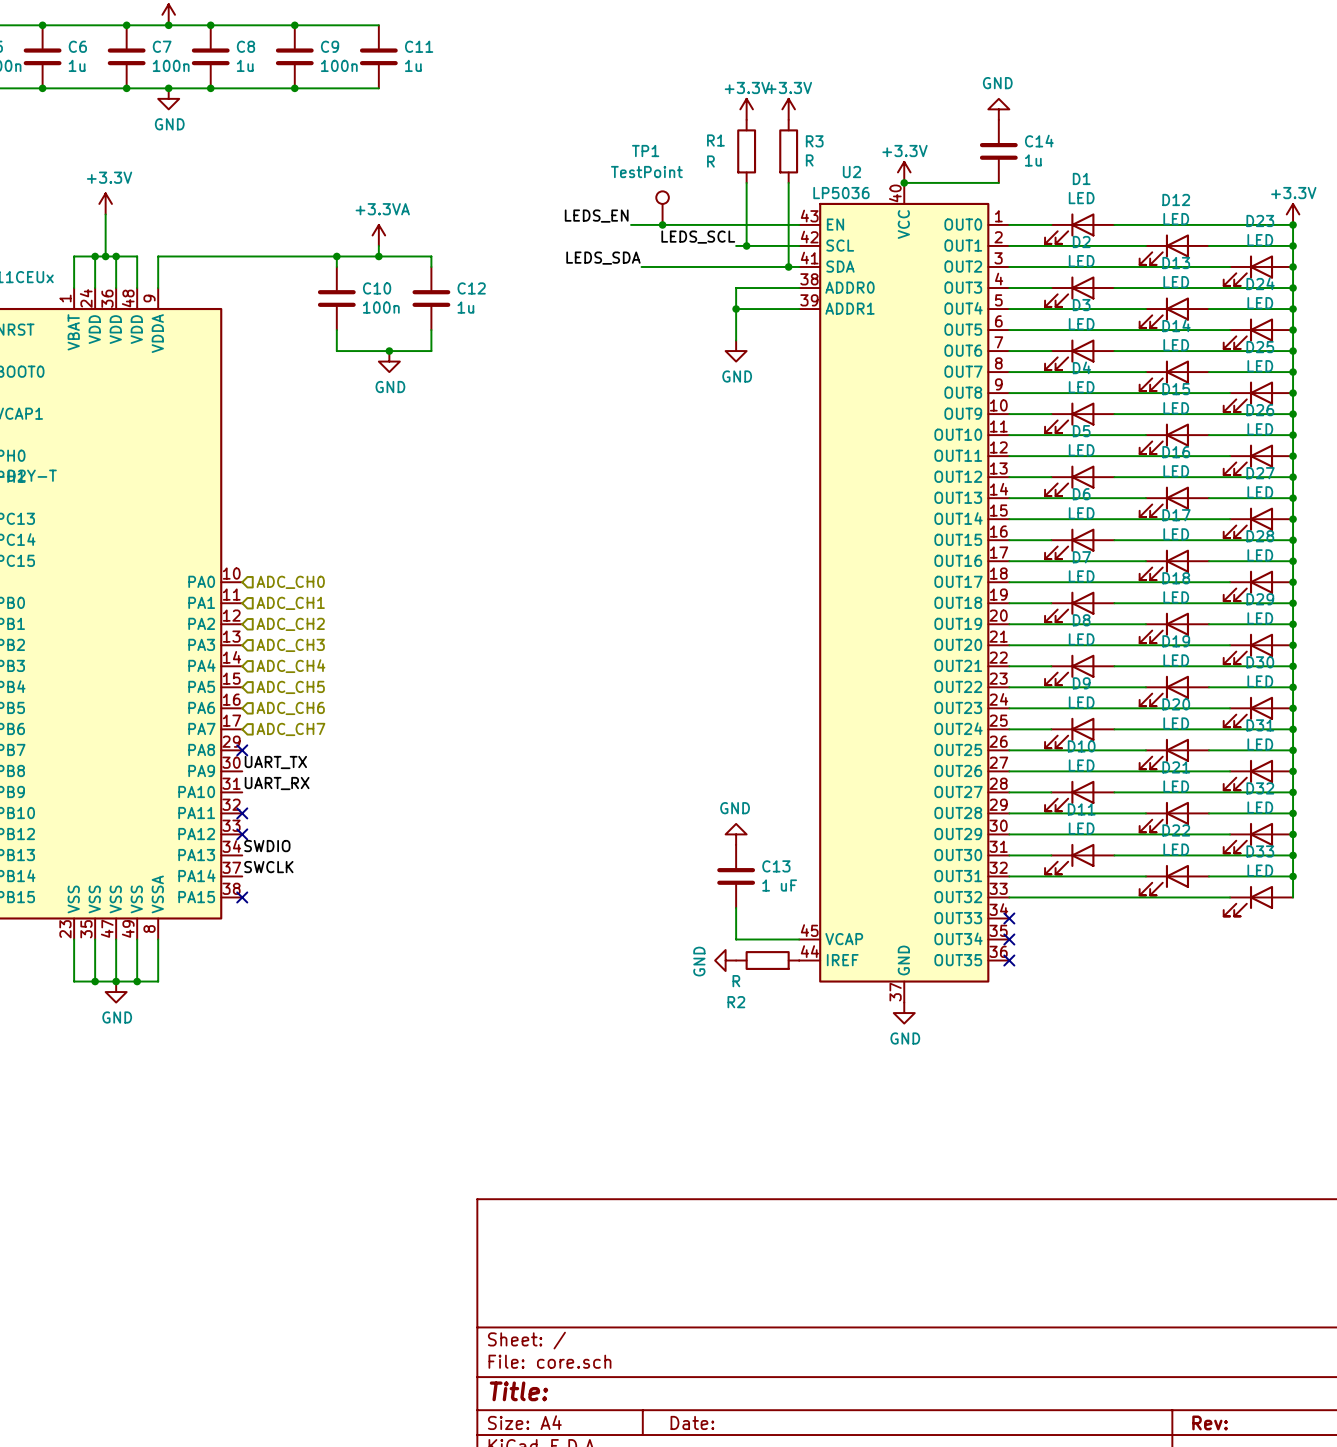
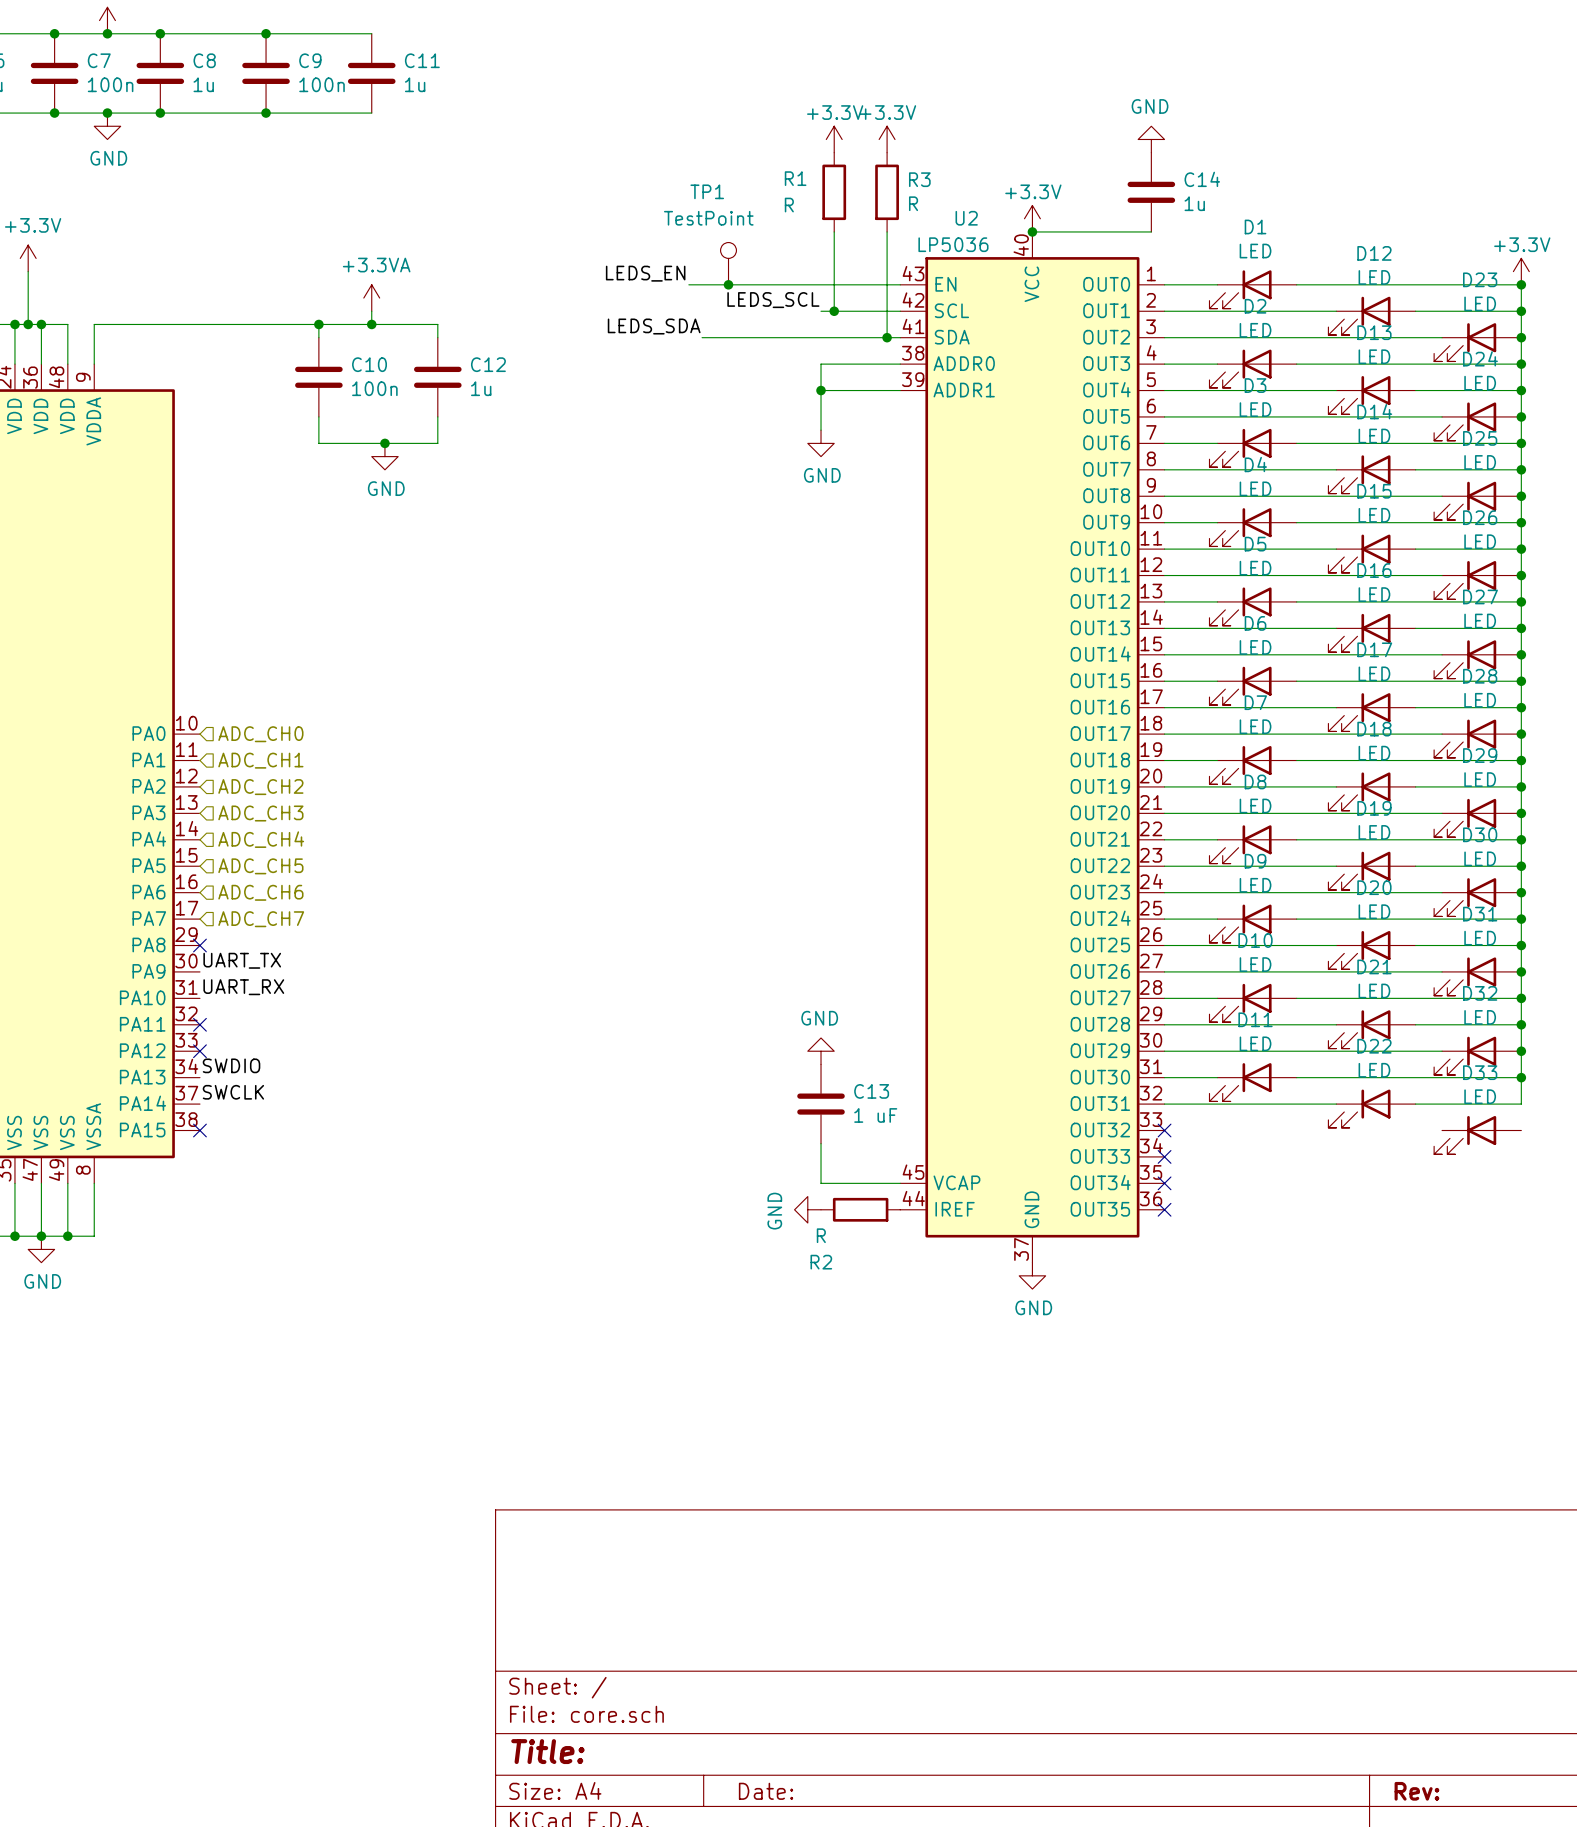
wire: (1293, 876) (1293, 897) -> none
junction: (1293, 876) -> none
wire: (1009, 897) (1230, 897) -> none
no-connect mark: none -> (1164, 1130)

